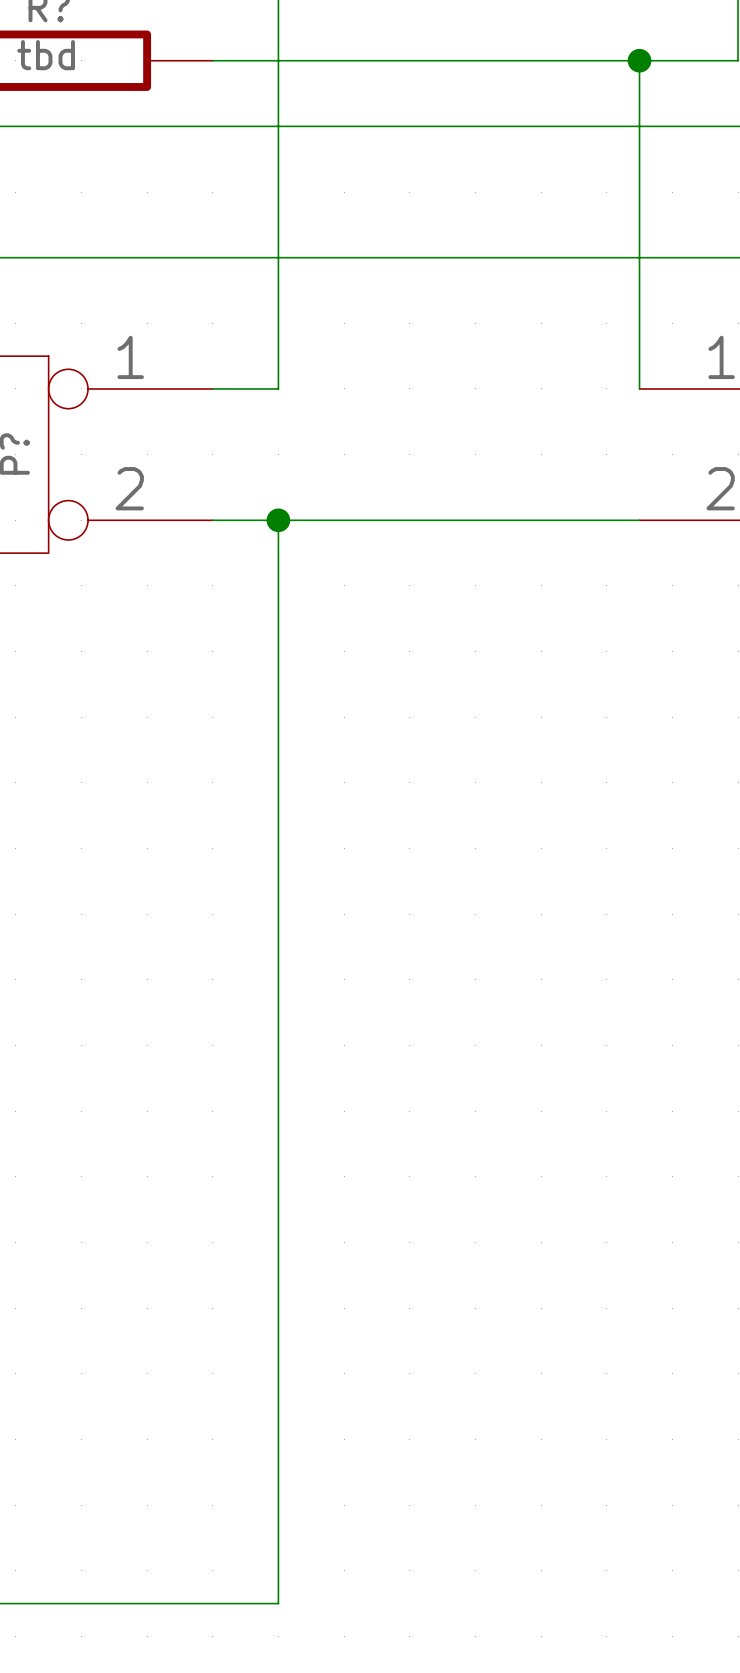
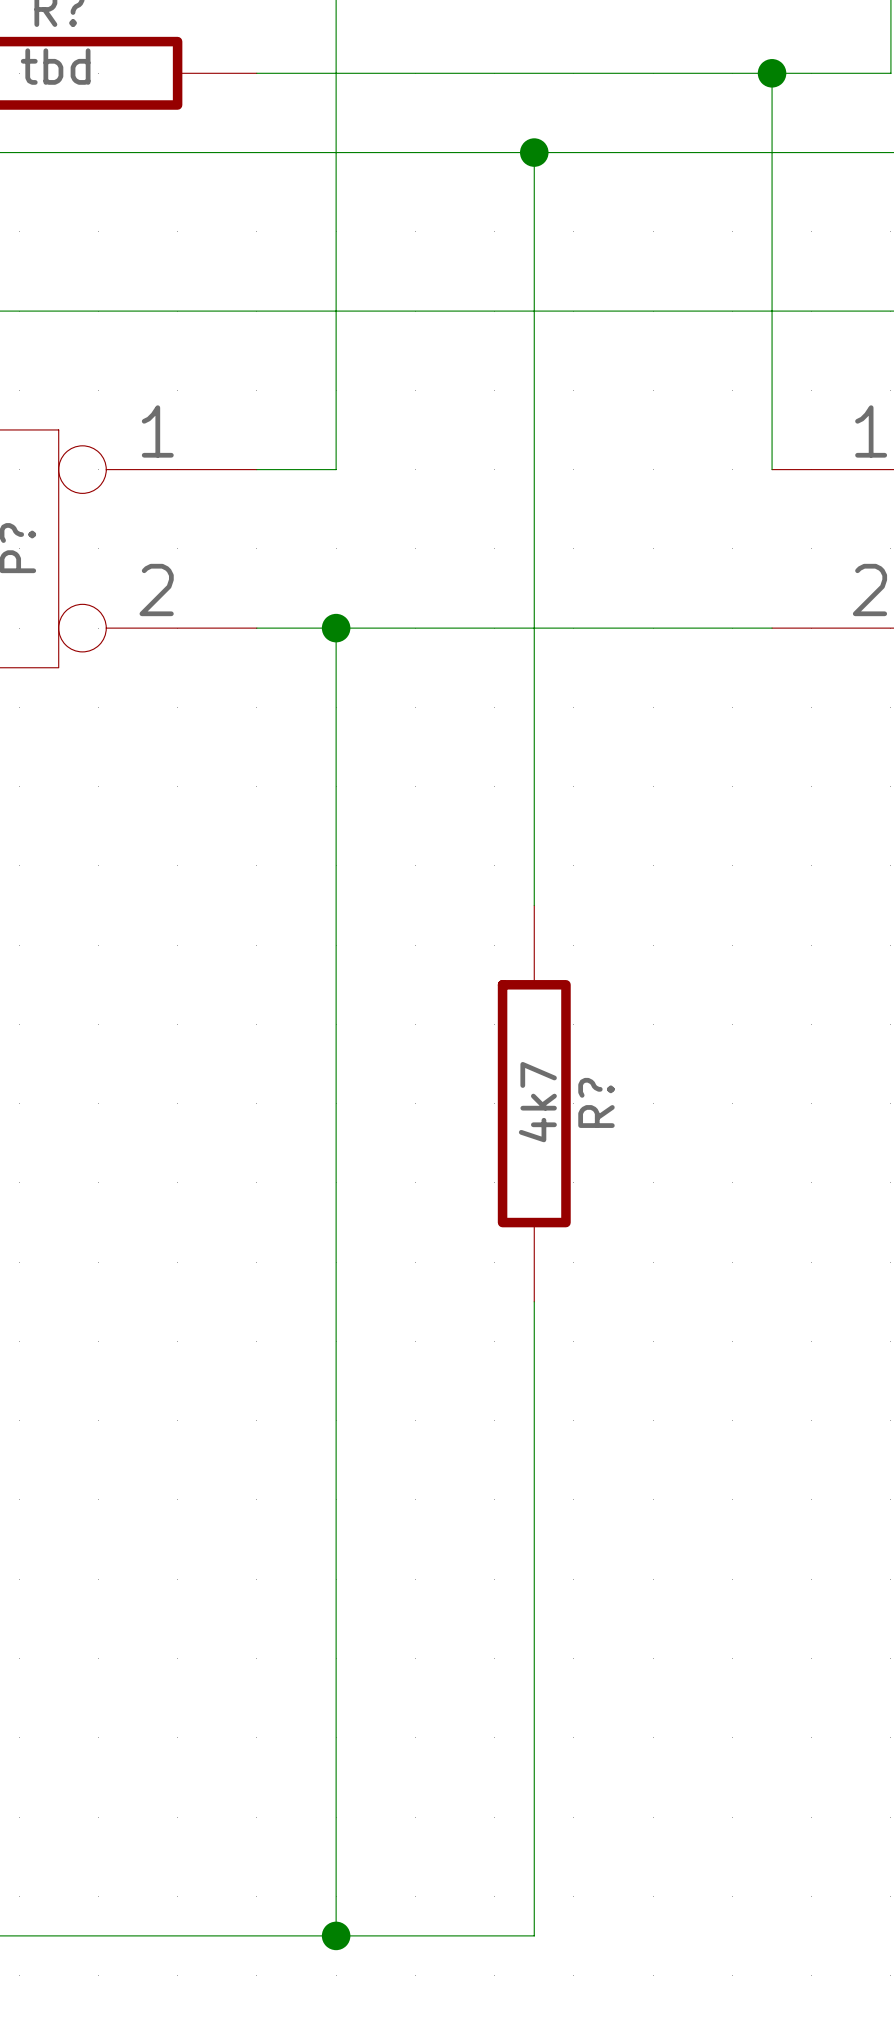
wire: none -> (534, 152) (534, 905)
junction: none -> (534, 152)
R?: none -> 4k7 (534, 1103)
wire: none -> (534, 1301) (534, 1935) (336, 1935)
junction: none -> (336, 1935)

